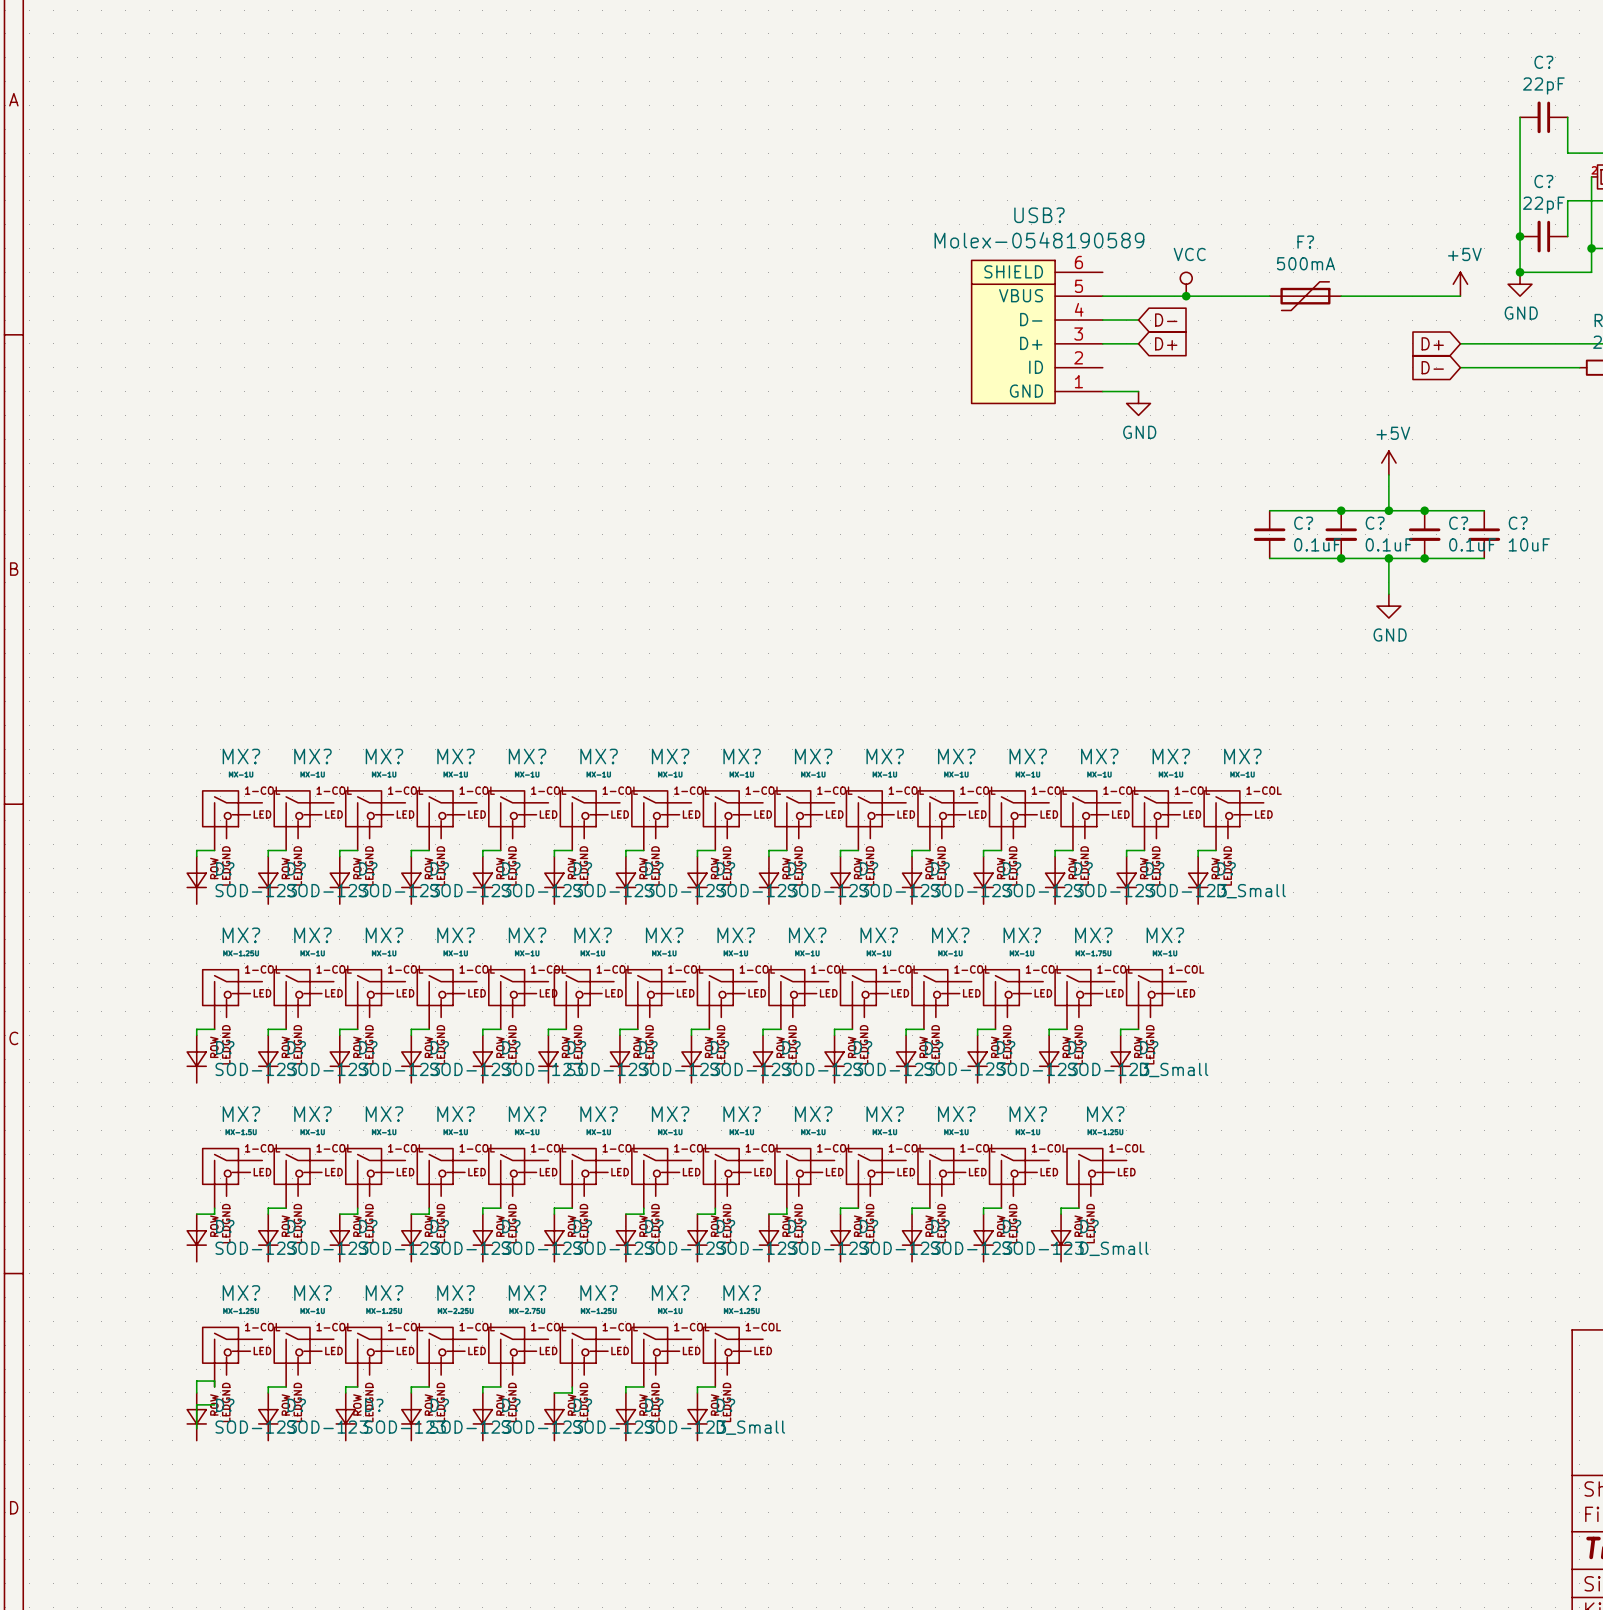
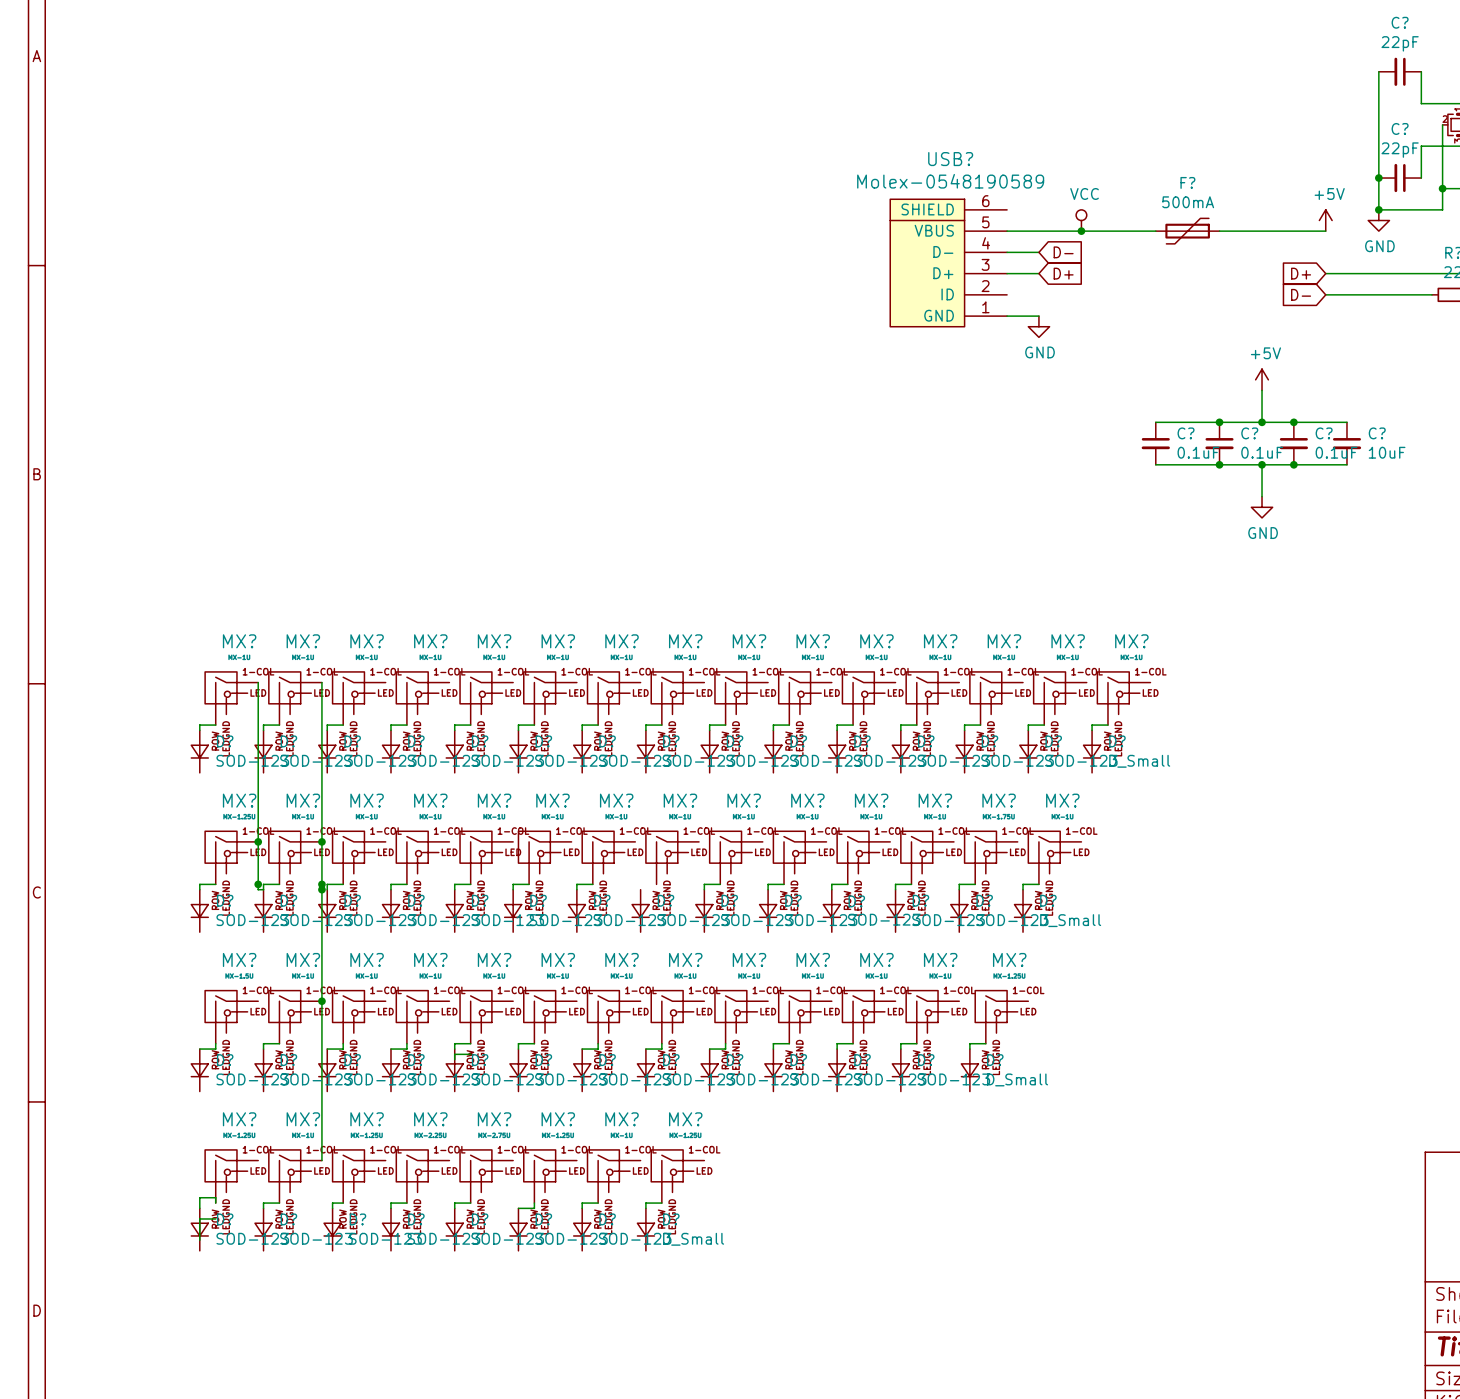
wire: none -> (258, 682) (258, 889) (263, 889)
wire: none -> (321, 682) (321, 1160)
junction: none -> (258, 841)
junction: none -> (321, 841)
junction: none -> (258, 884)
junction: none -> (321, 884)
wire: (709, 1029) (691, 1029) (691, 1035) -> none
junction: none -> (321, 889)
junction: none -> (321, 1001)
wire: none -> (470, 1054) (454, 1054) (454, 1059)

